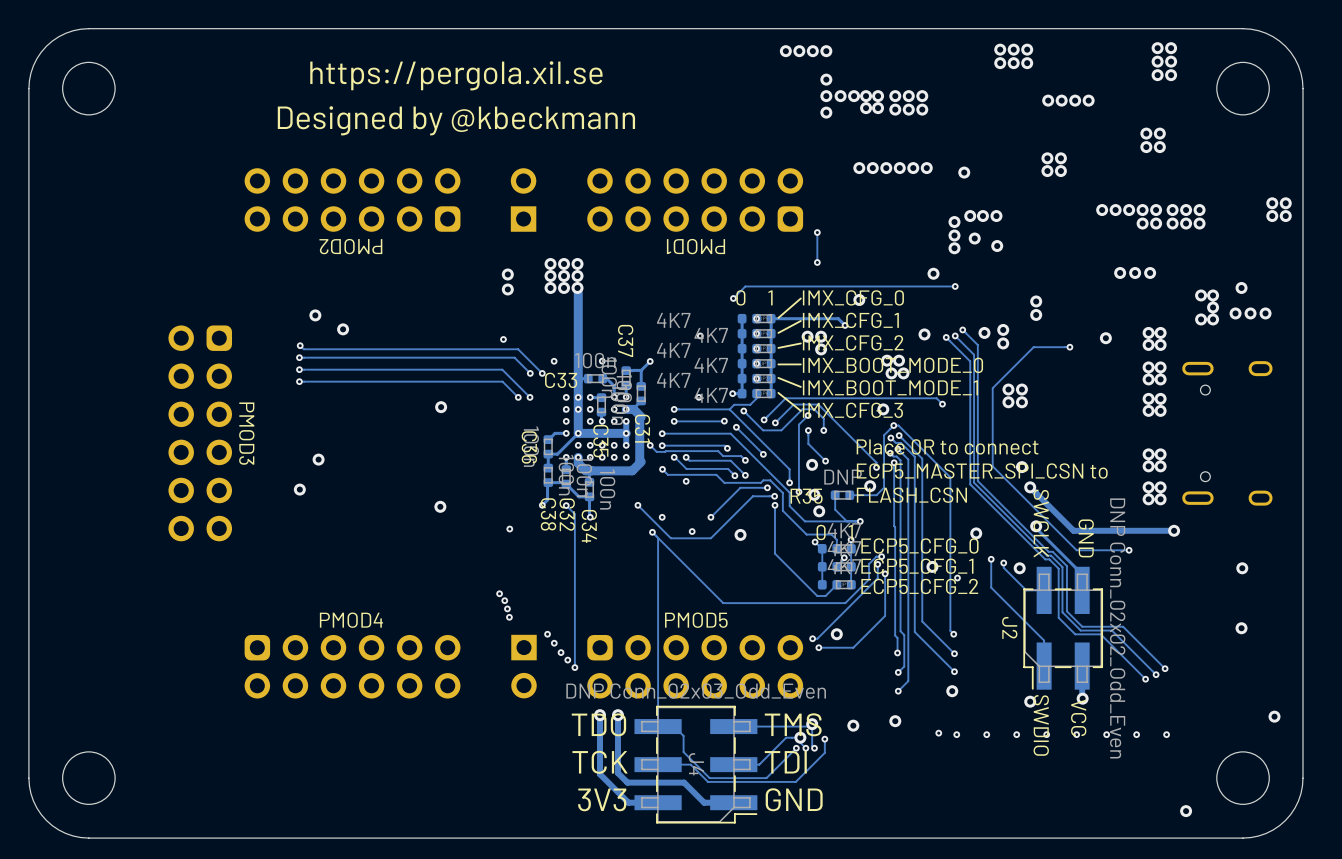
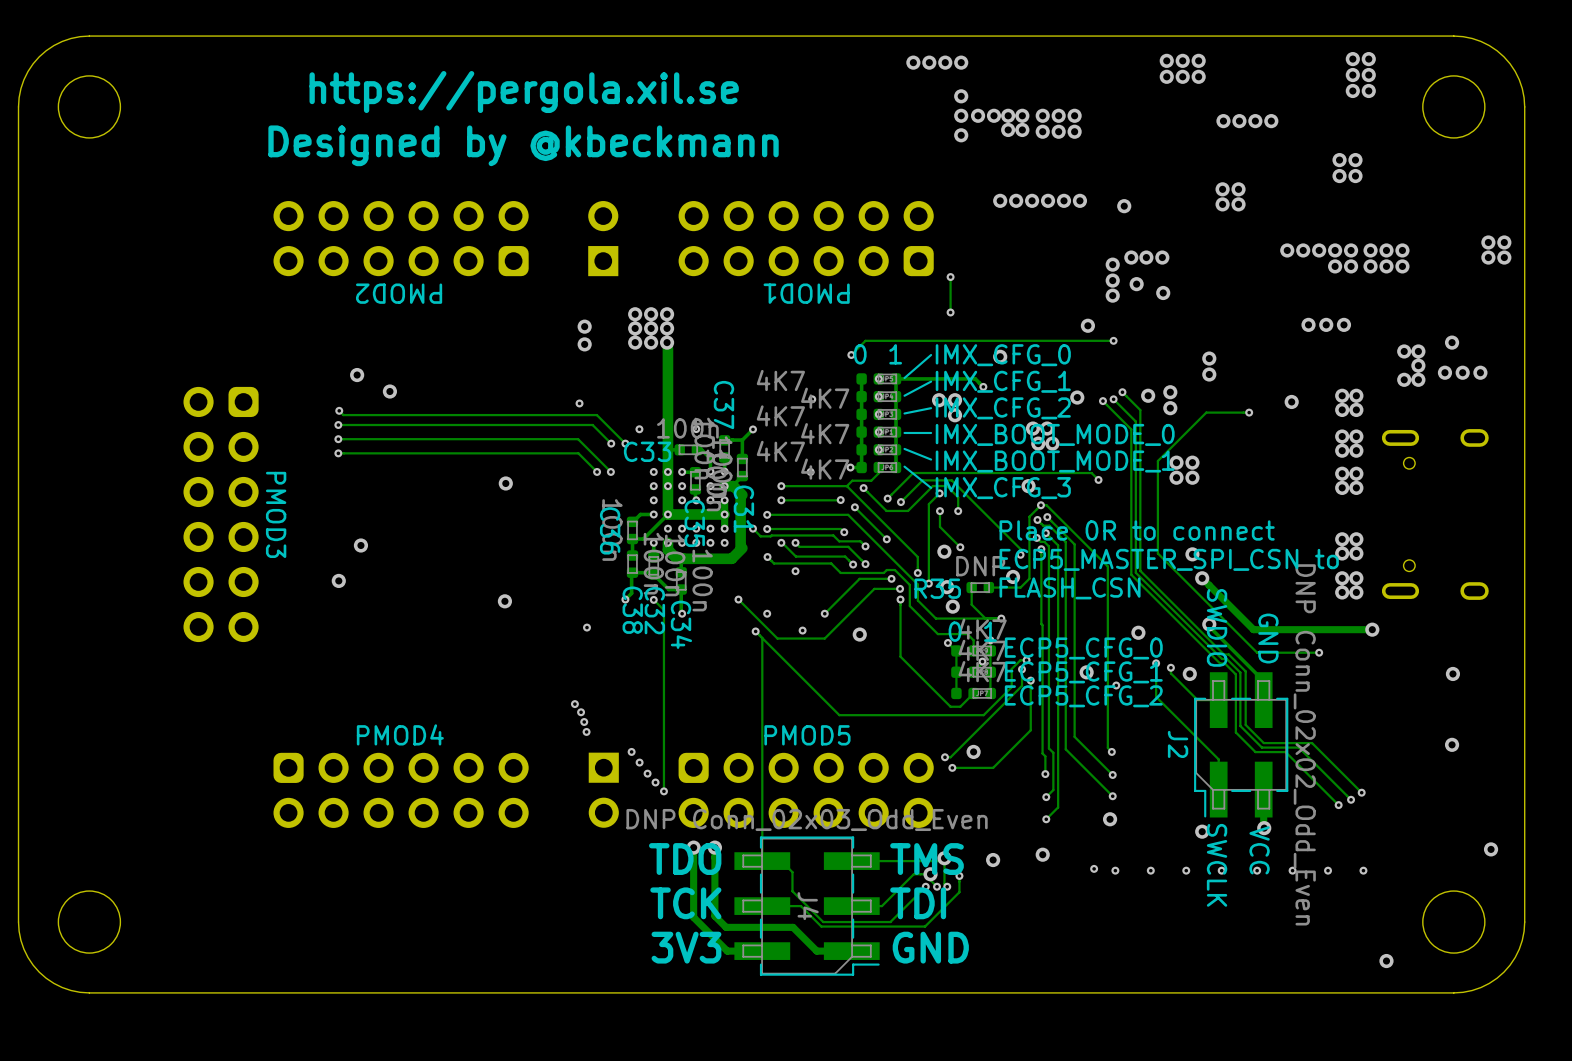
text position: SWCLK (1041, 523) -> SWCLK (1217, 865)
text position: SWDIO (1041, 725) -> SWDIO (1217, 627)

